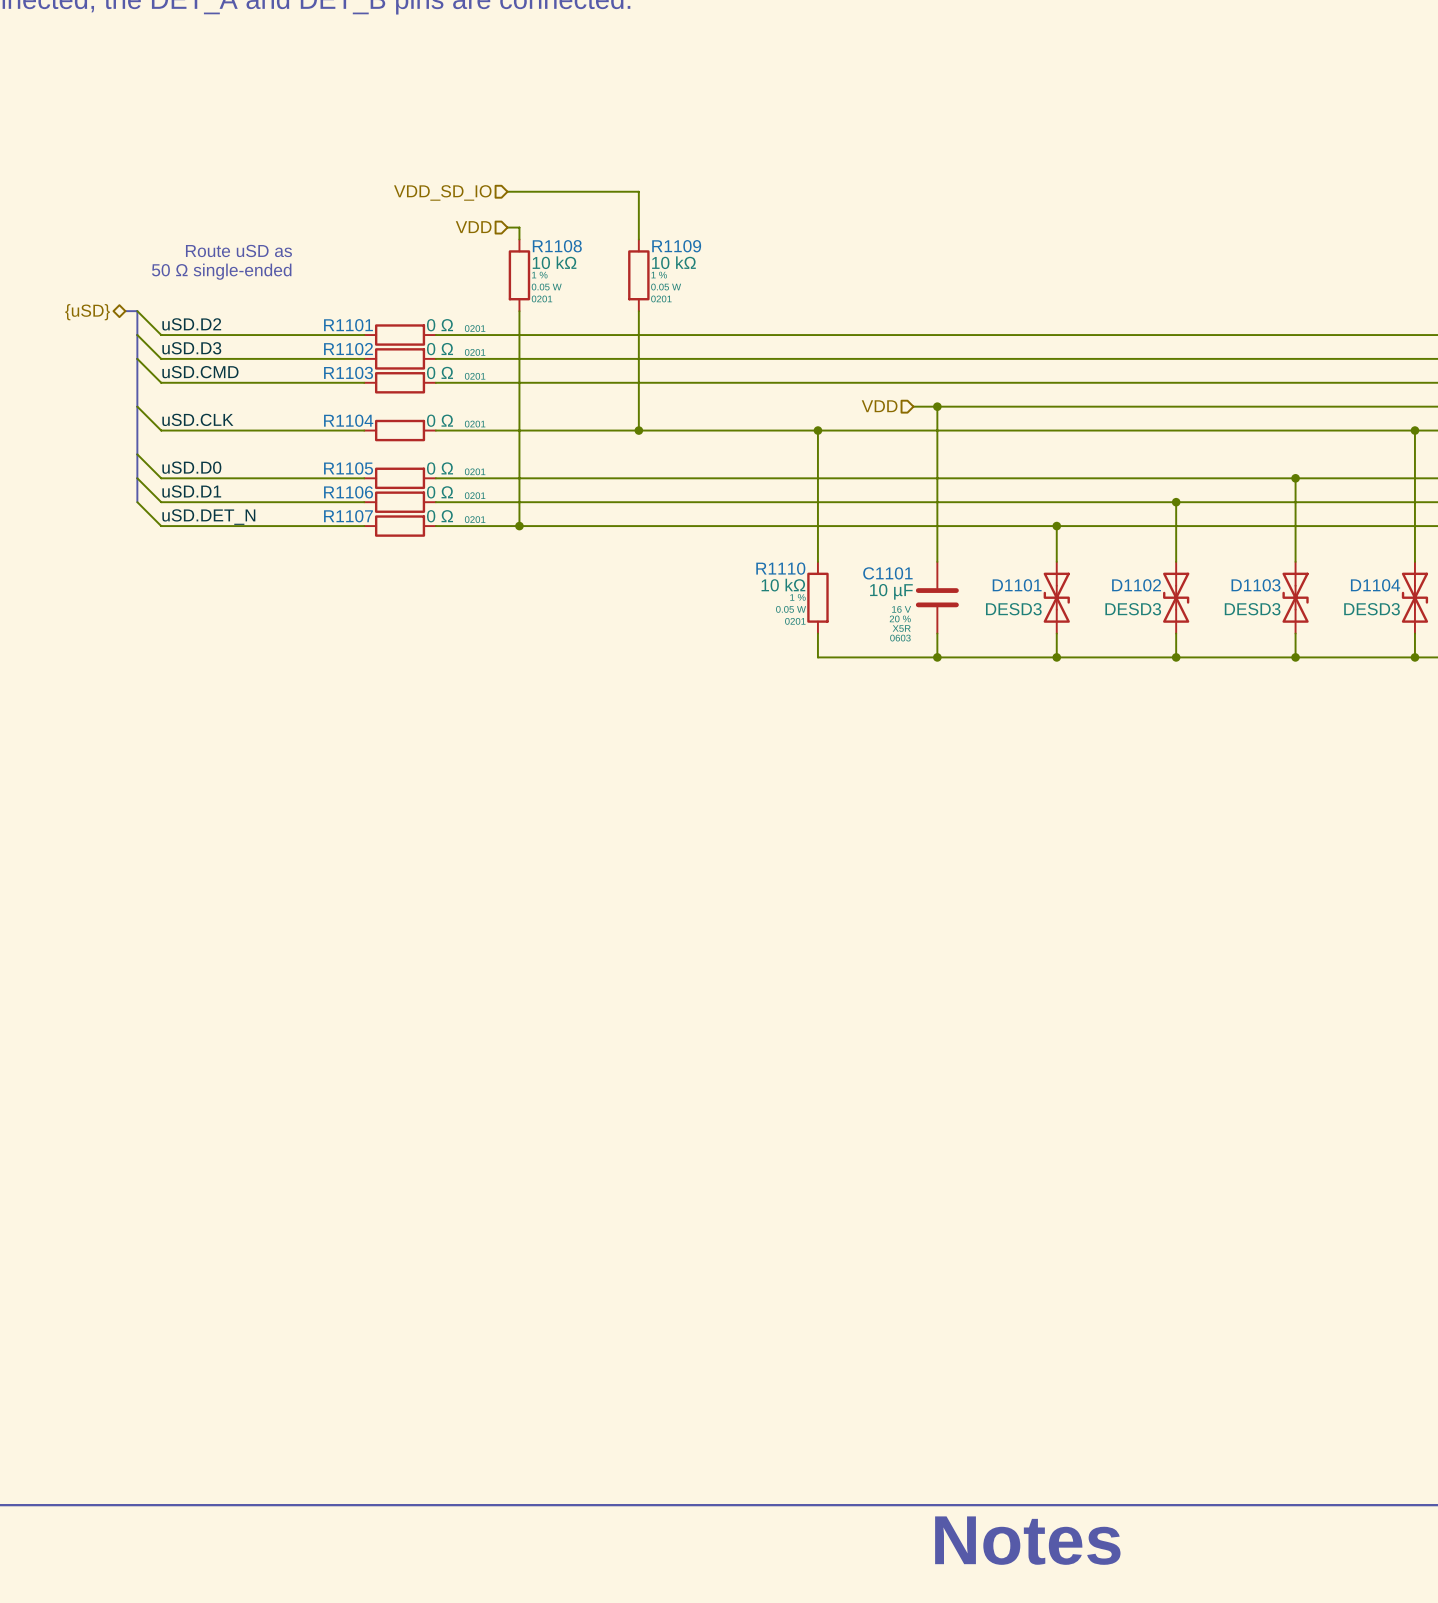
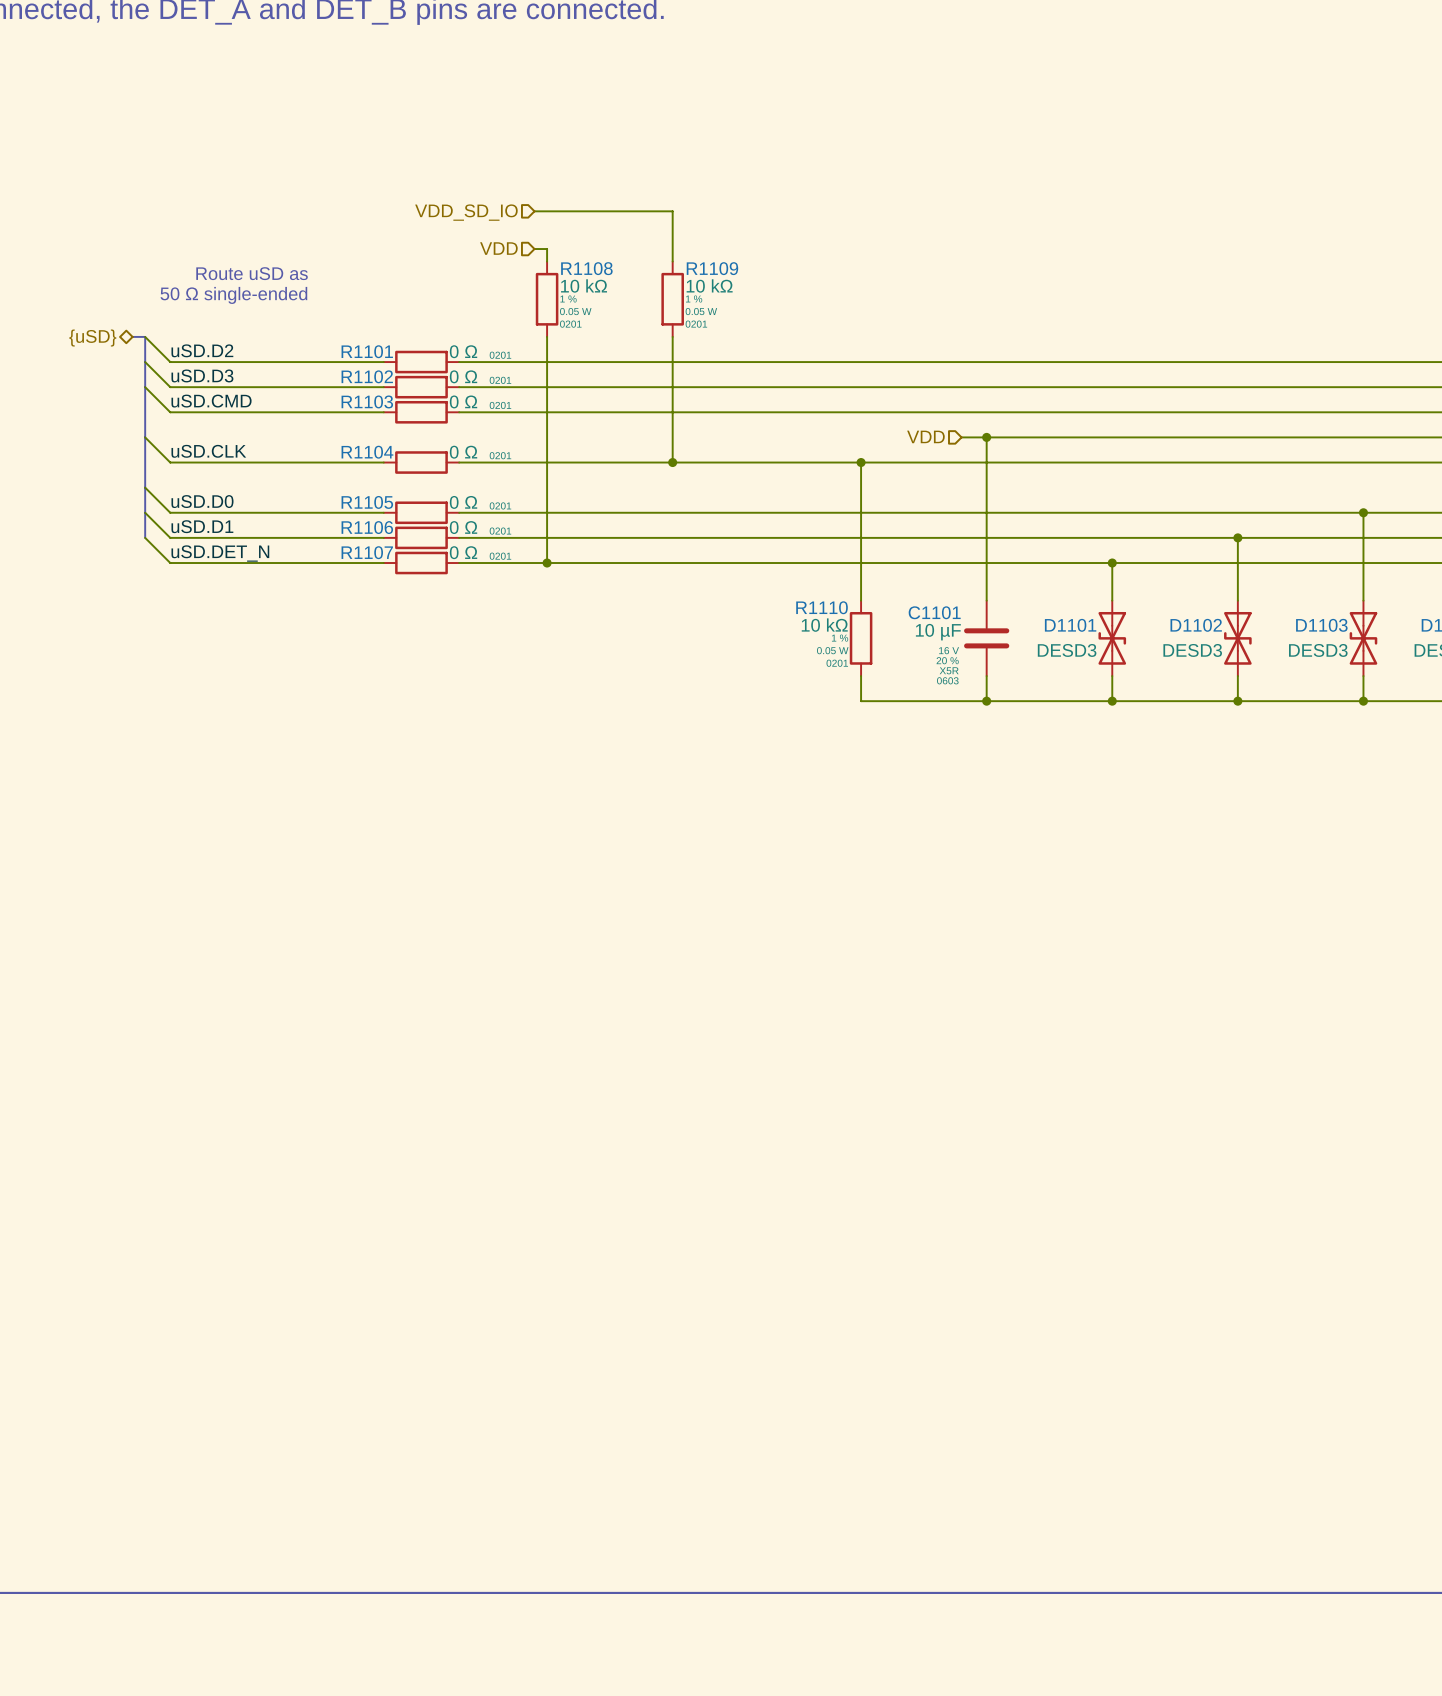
text: Notes (1027, 1540) -> none

